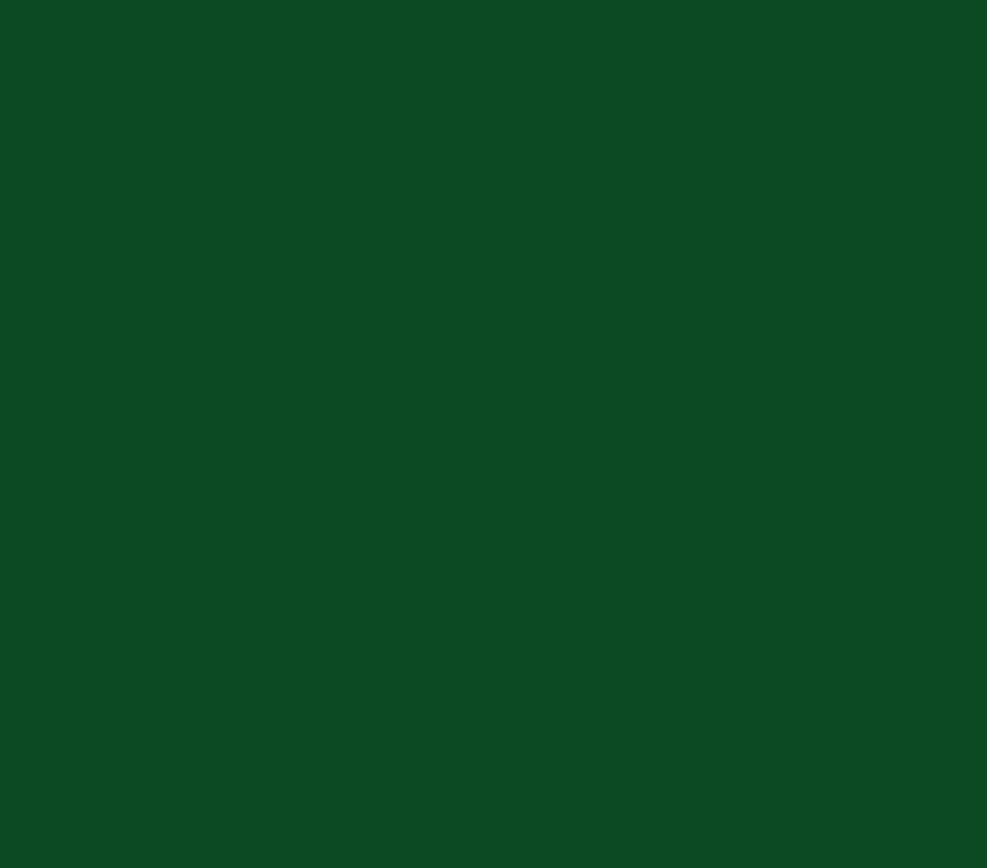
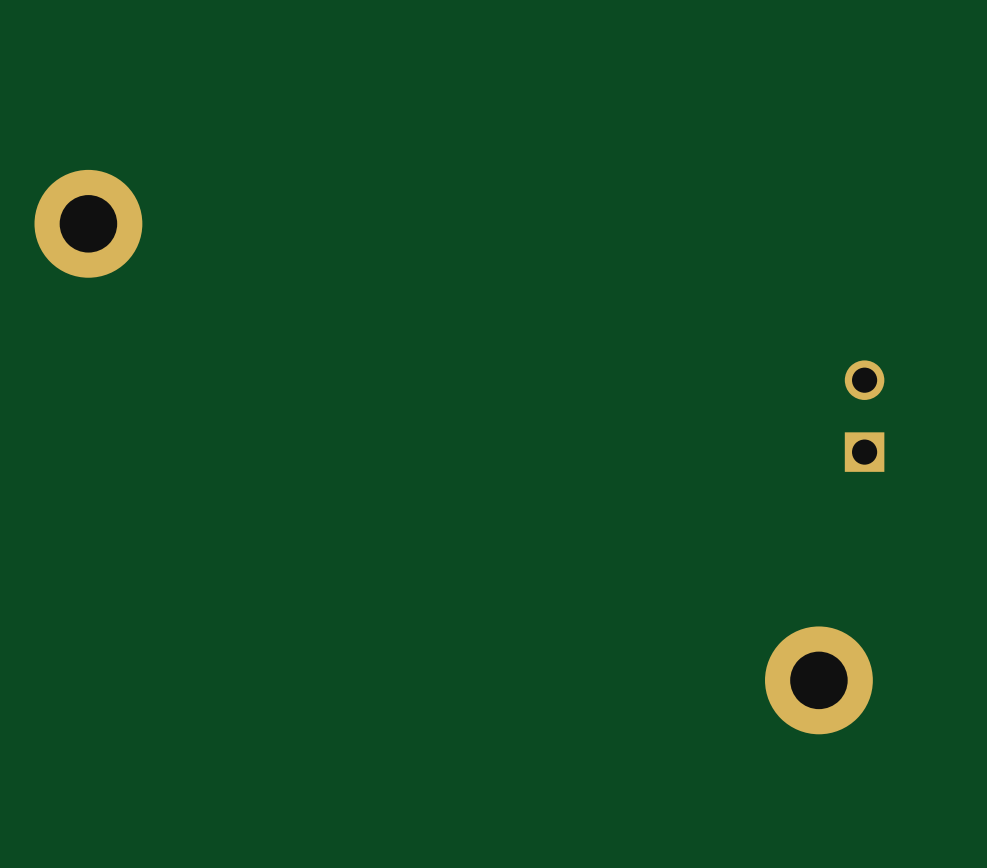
part: none -> (88, 223)
part: none -> (864, 416)
part: none -> (818, 680)

